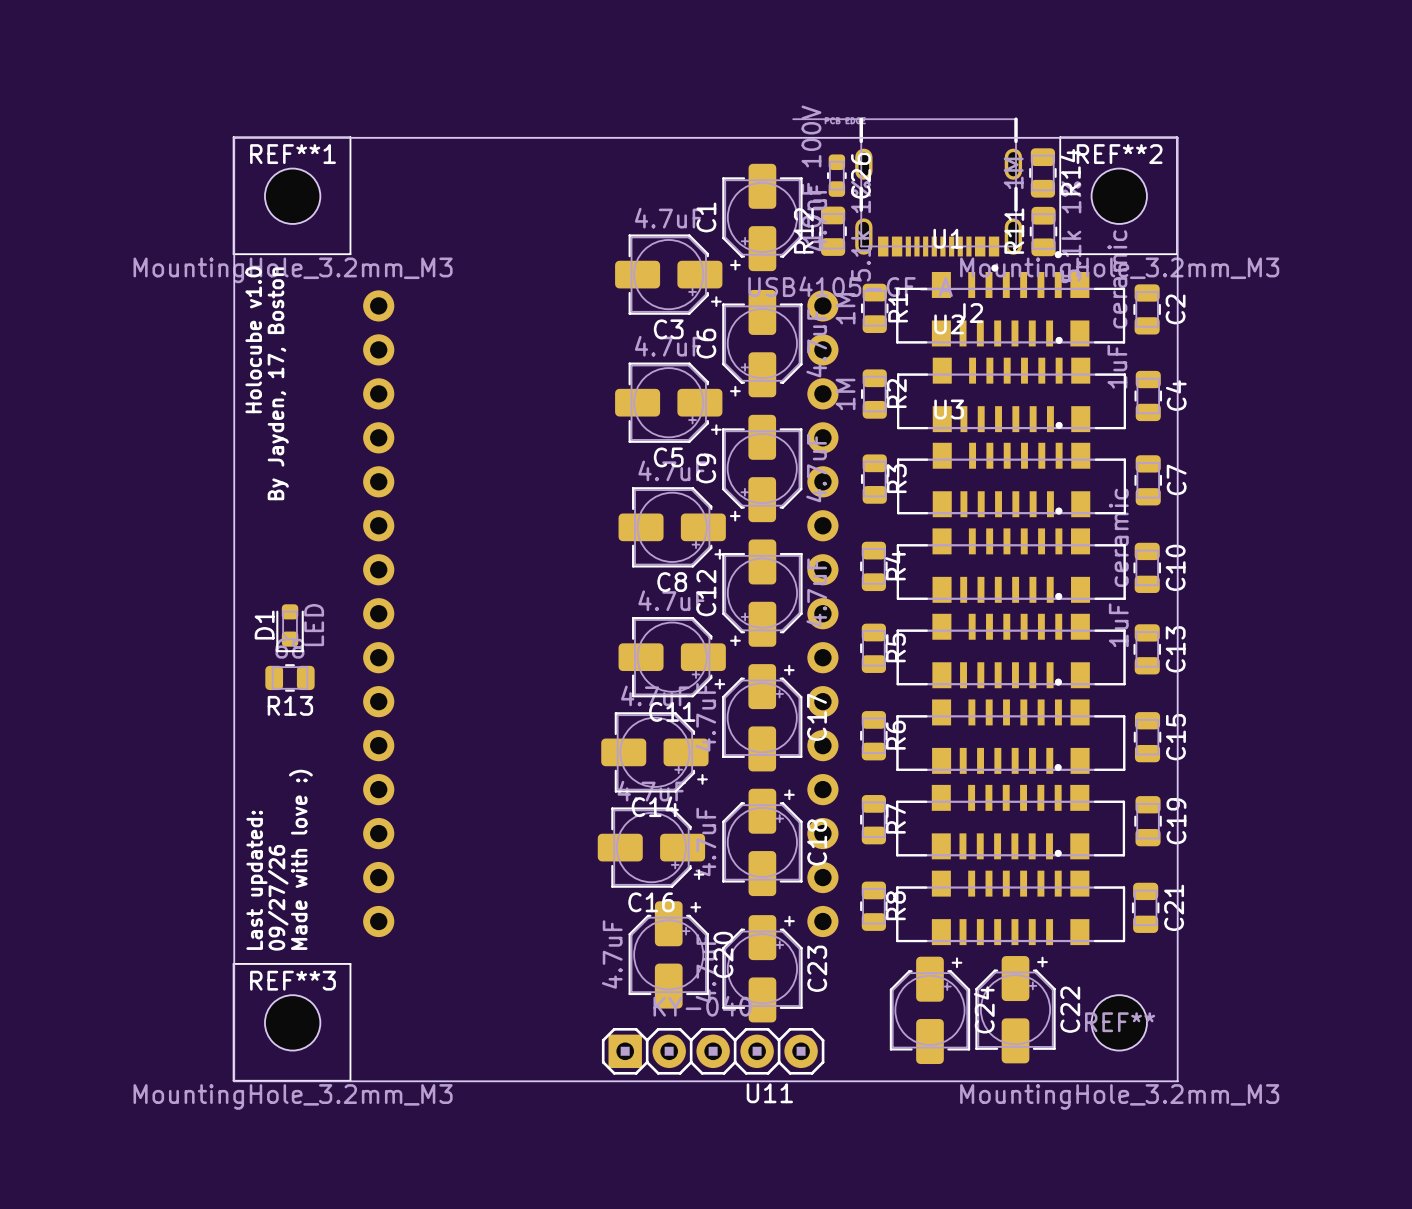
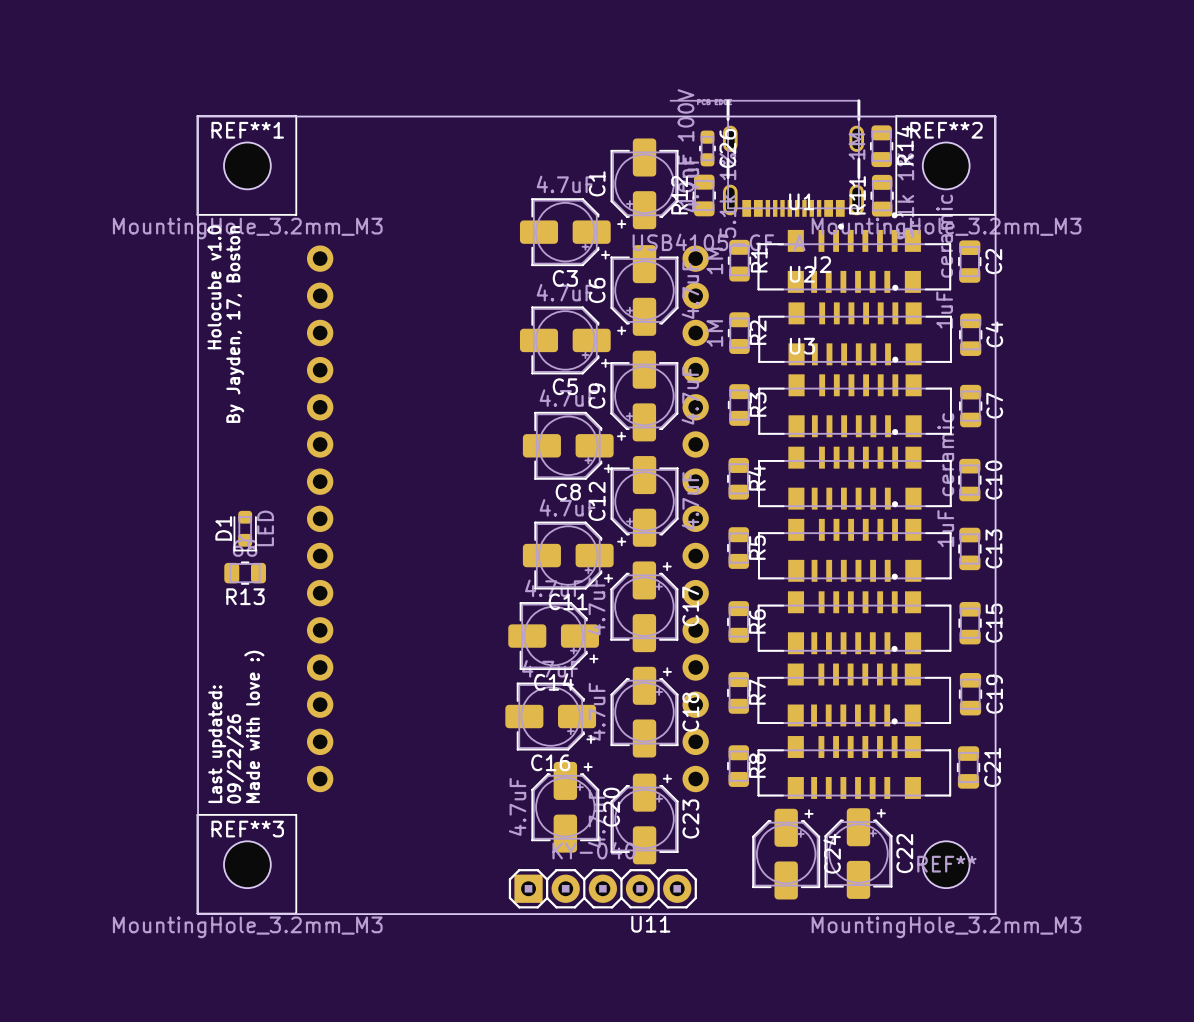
text: 09/27/26 (278, 897) -> 09/22/26 (235, 758)

